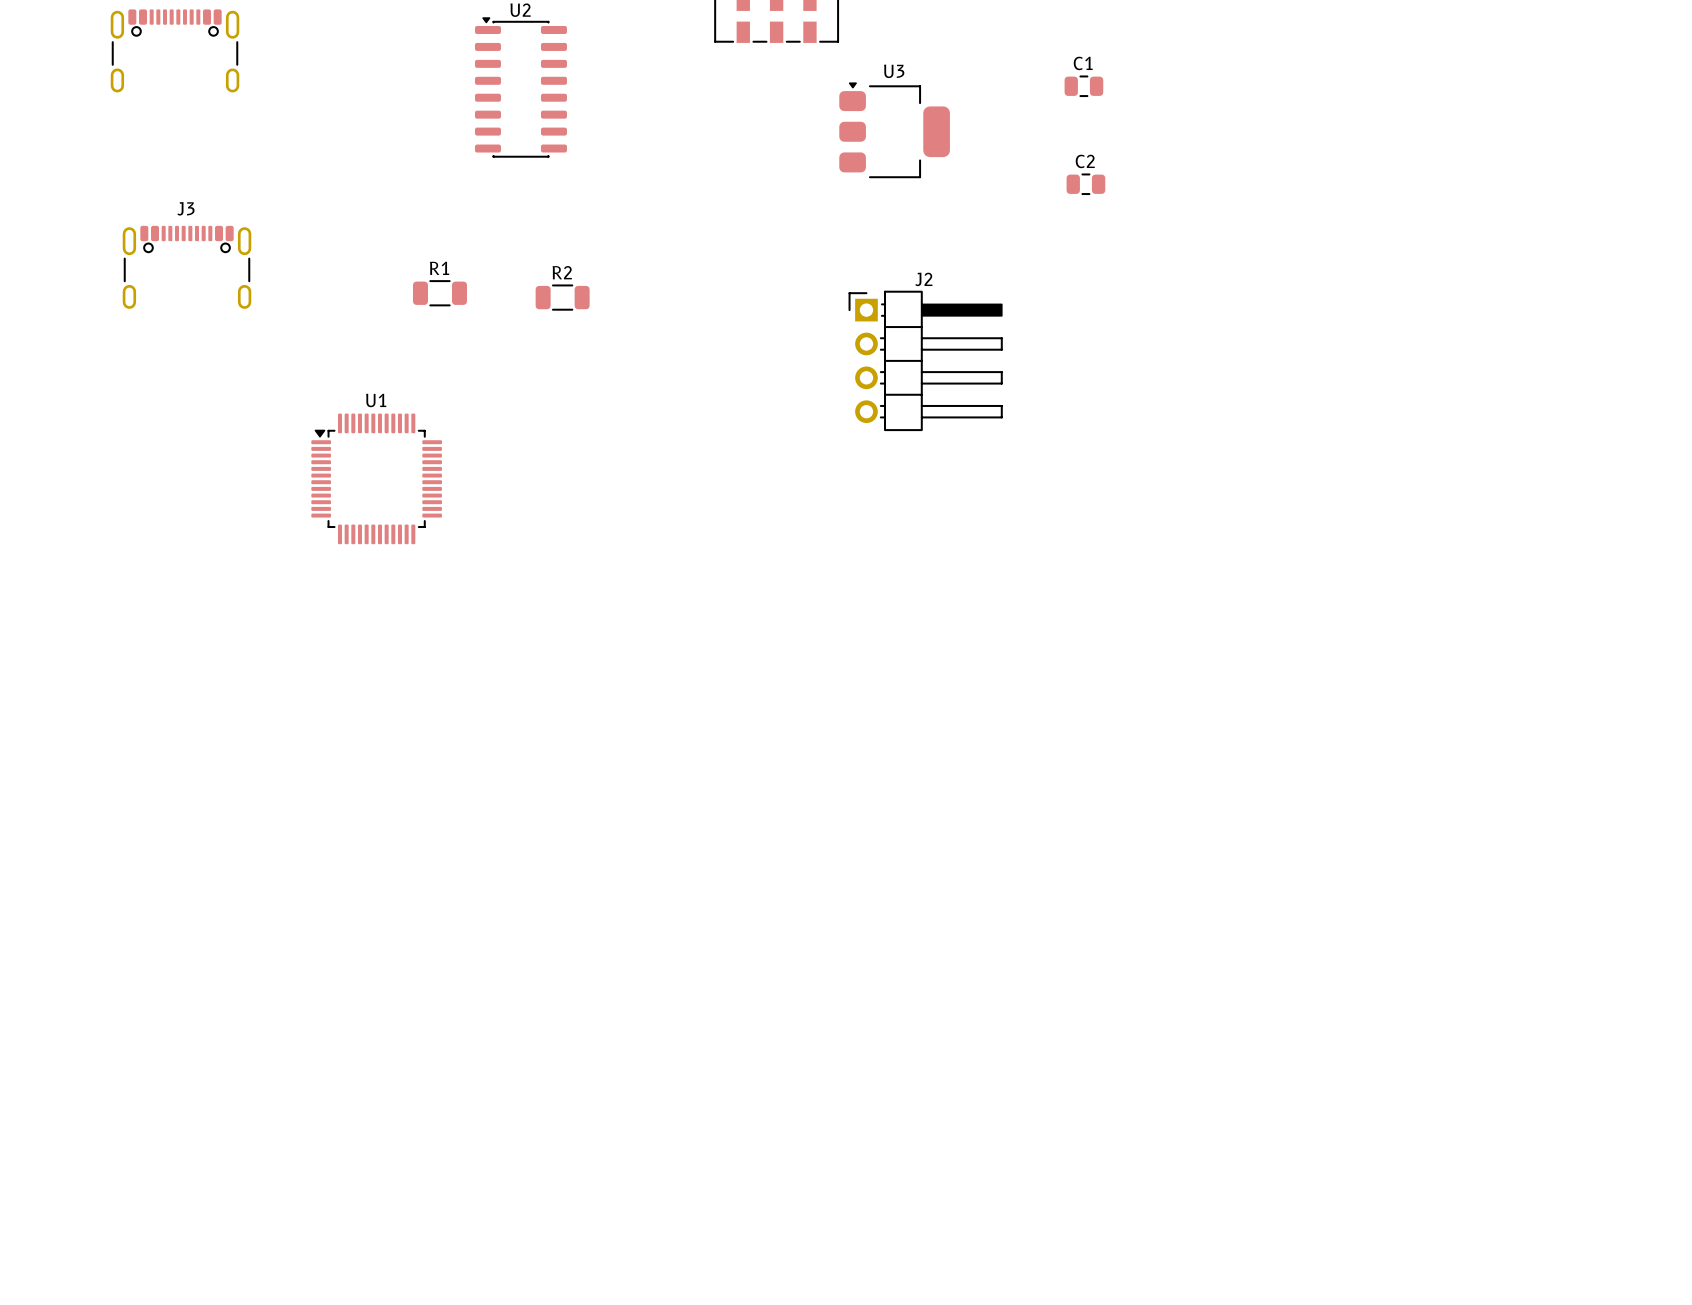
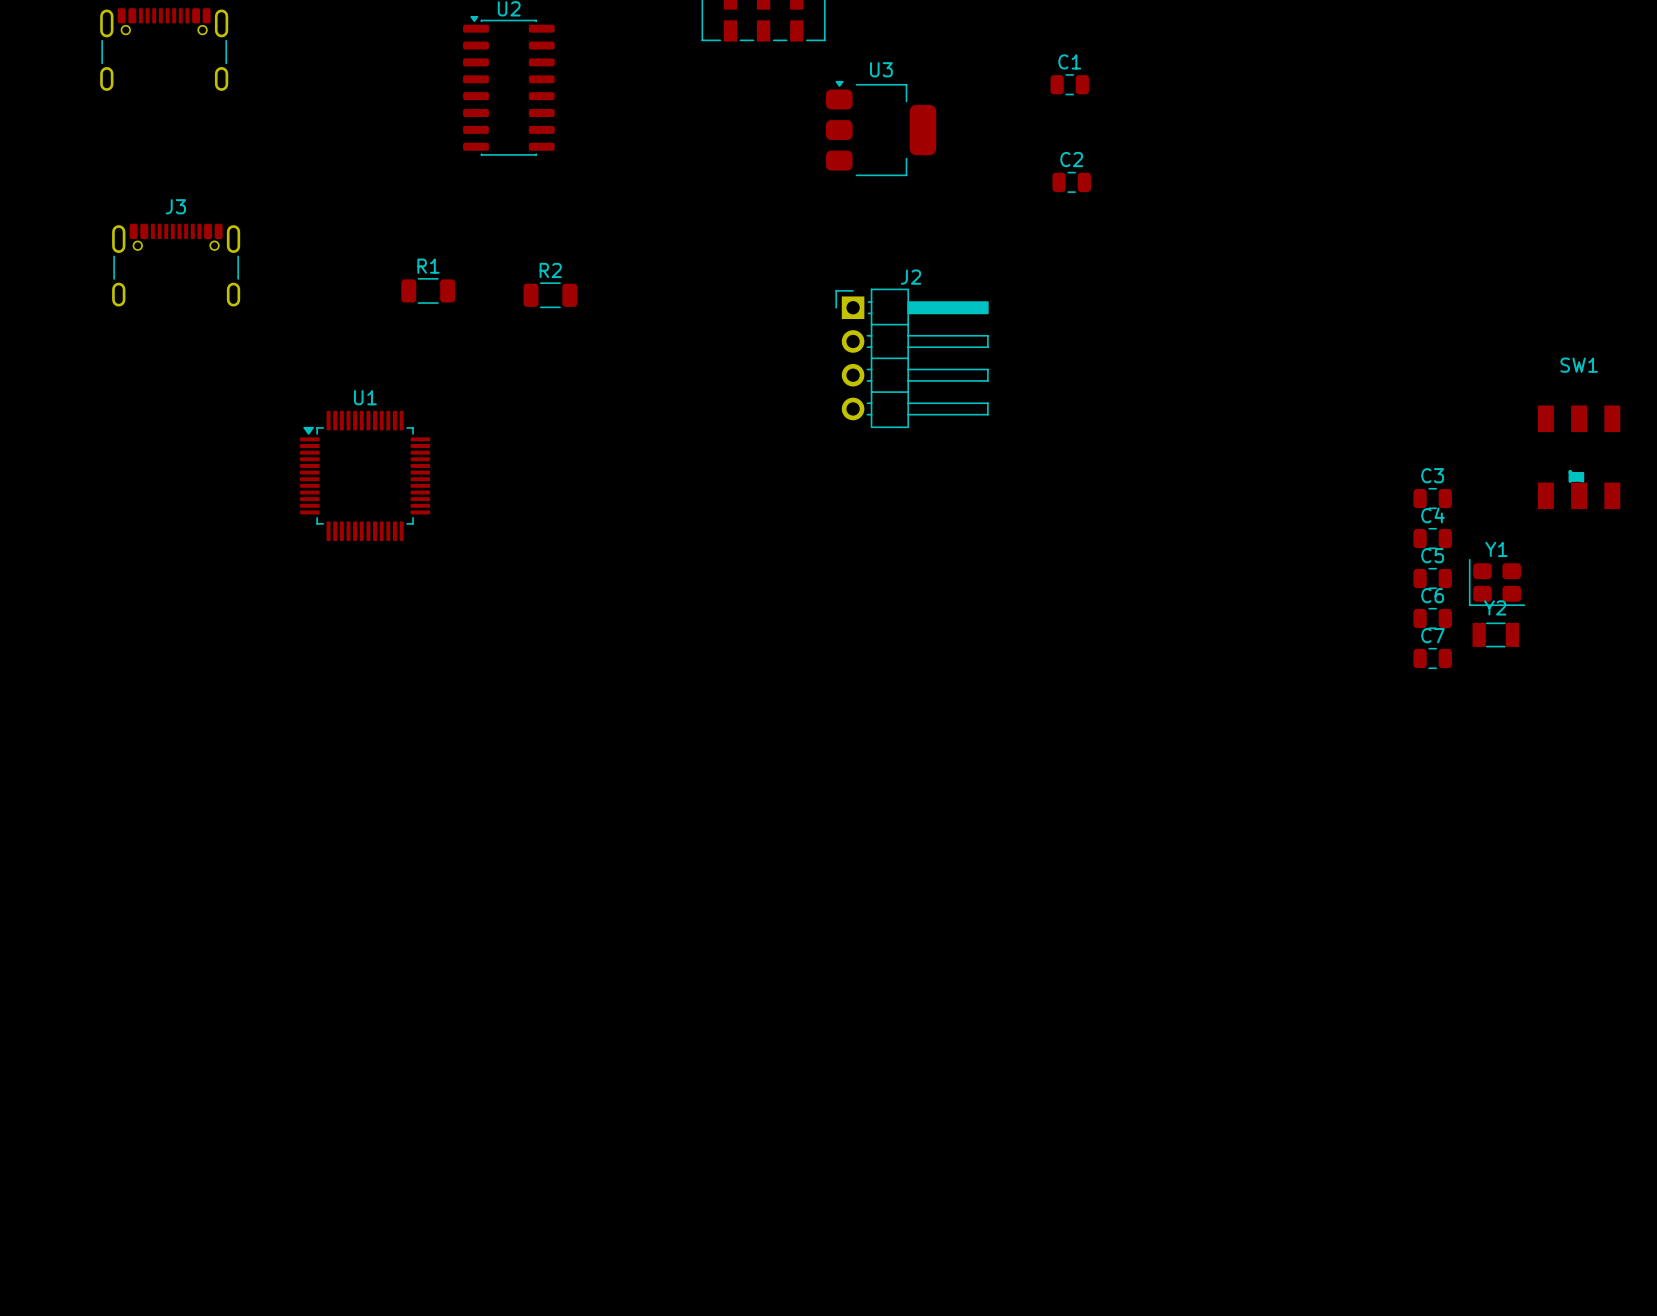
SW1: none -> (1579, 457)
C3: none -> (1432, 498)
C4: none -> (1432, 538)
C5: none -> (1432, 578)
Y1: none -> (1497, 582)
C6: none -> (1432, 618)
Y2: none -> (1495, 634)
C7: none -> (1432, 658)

